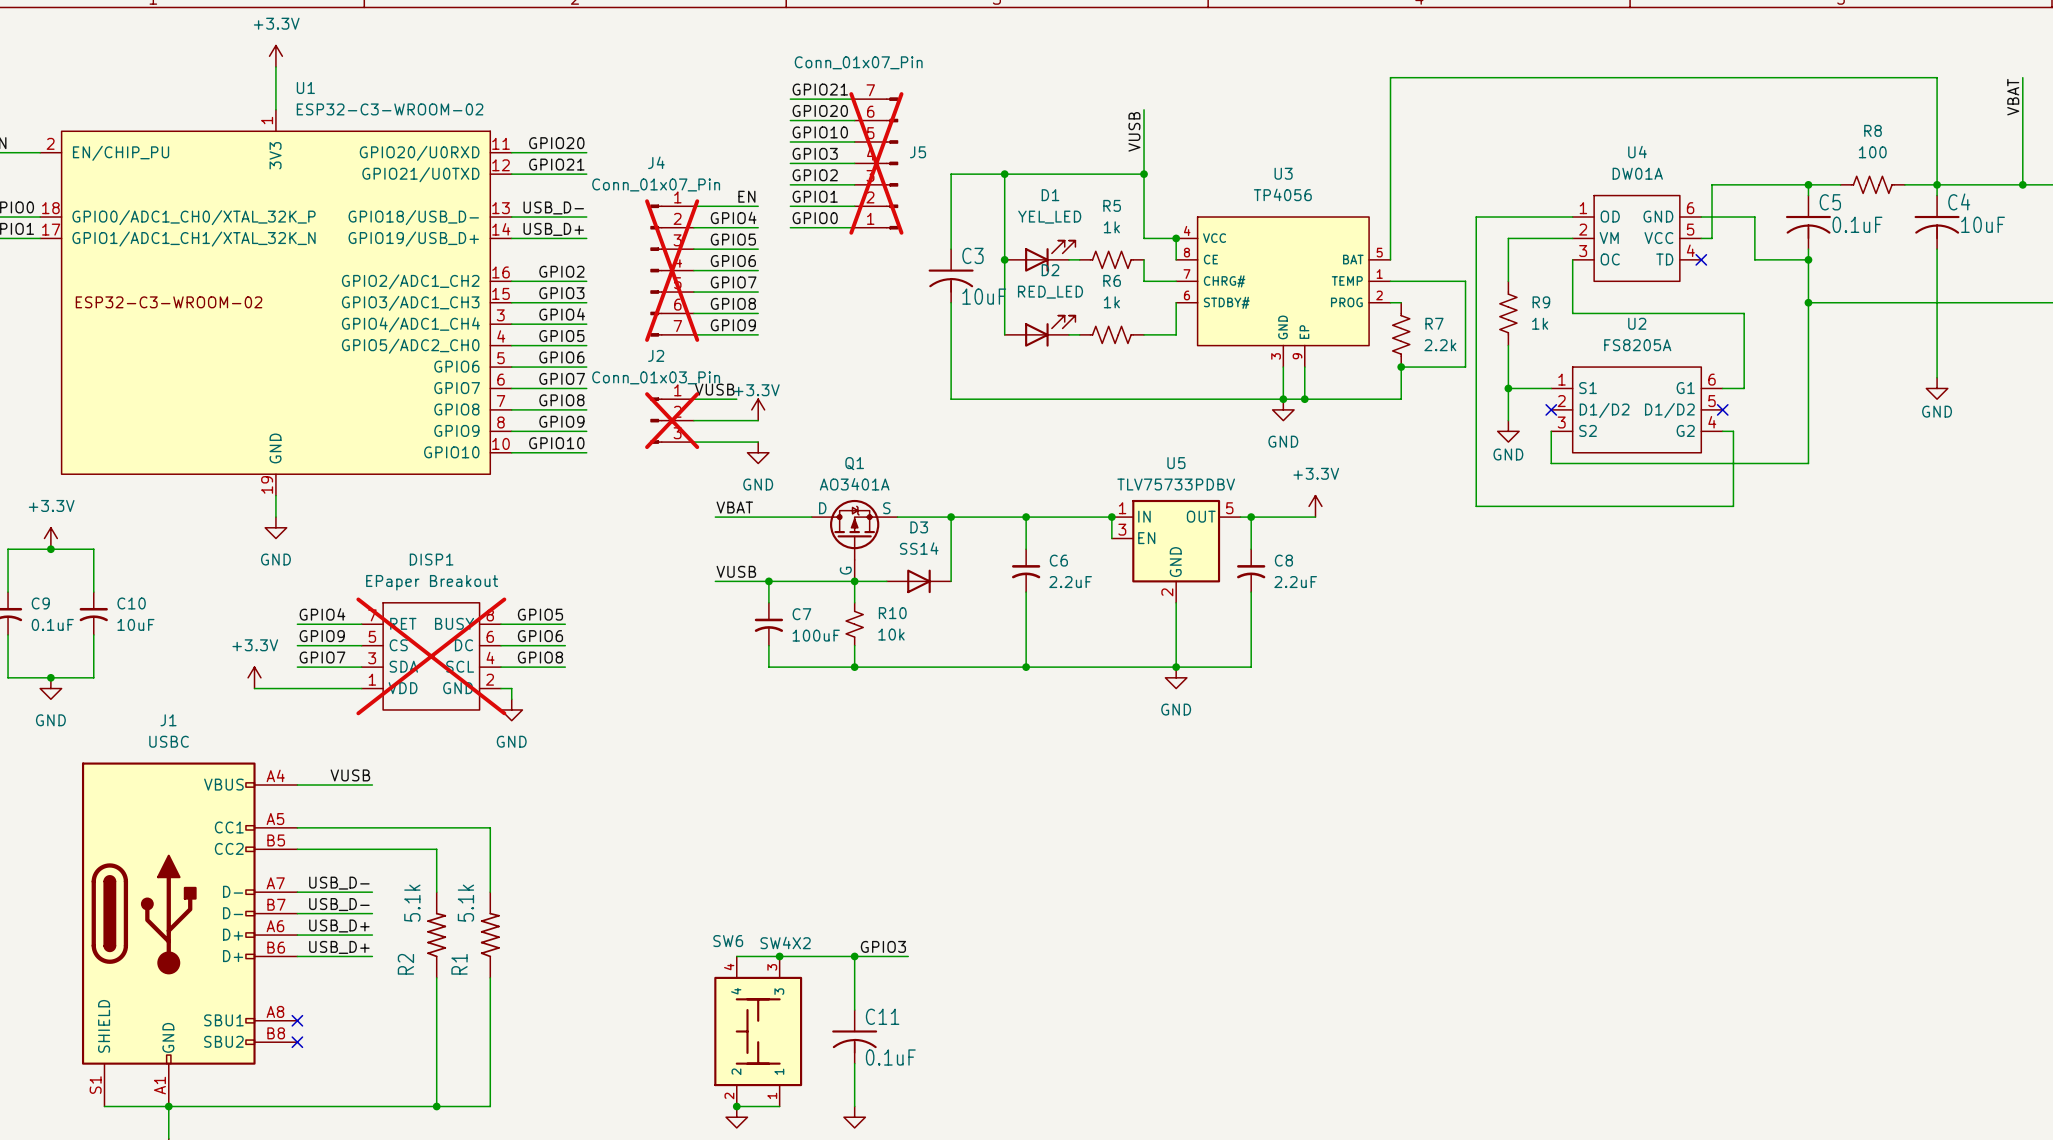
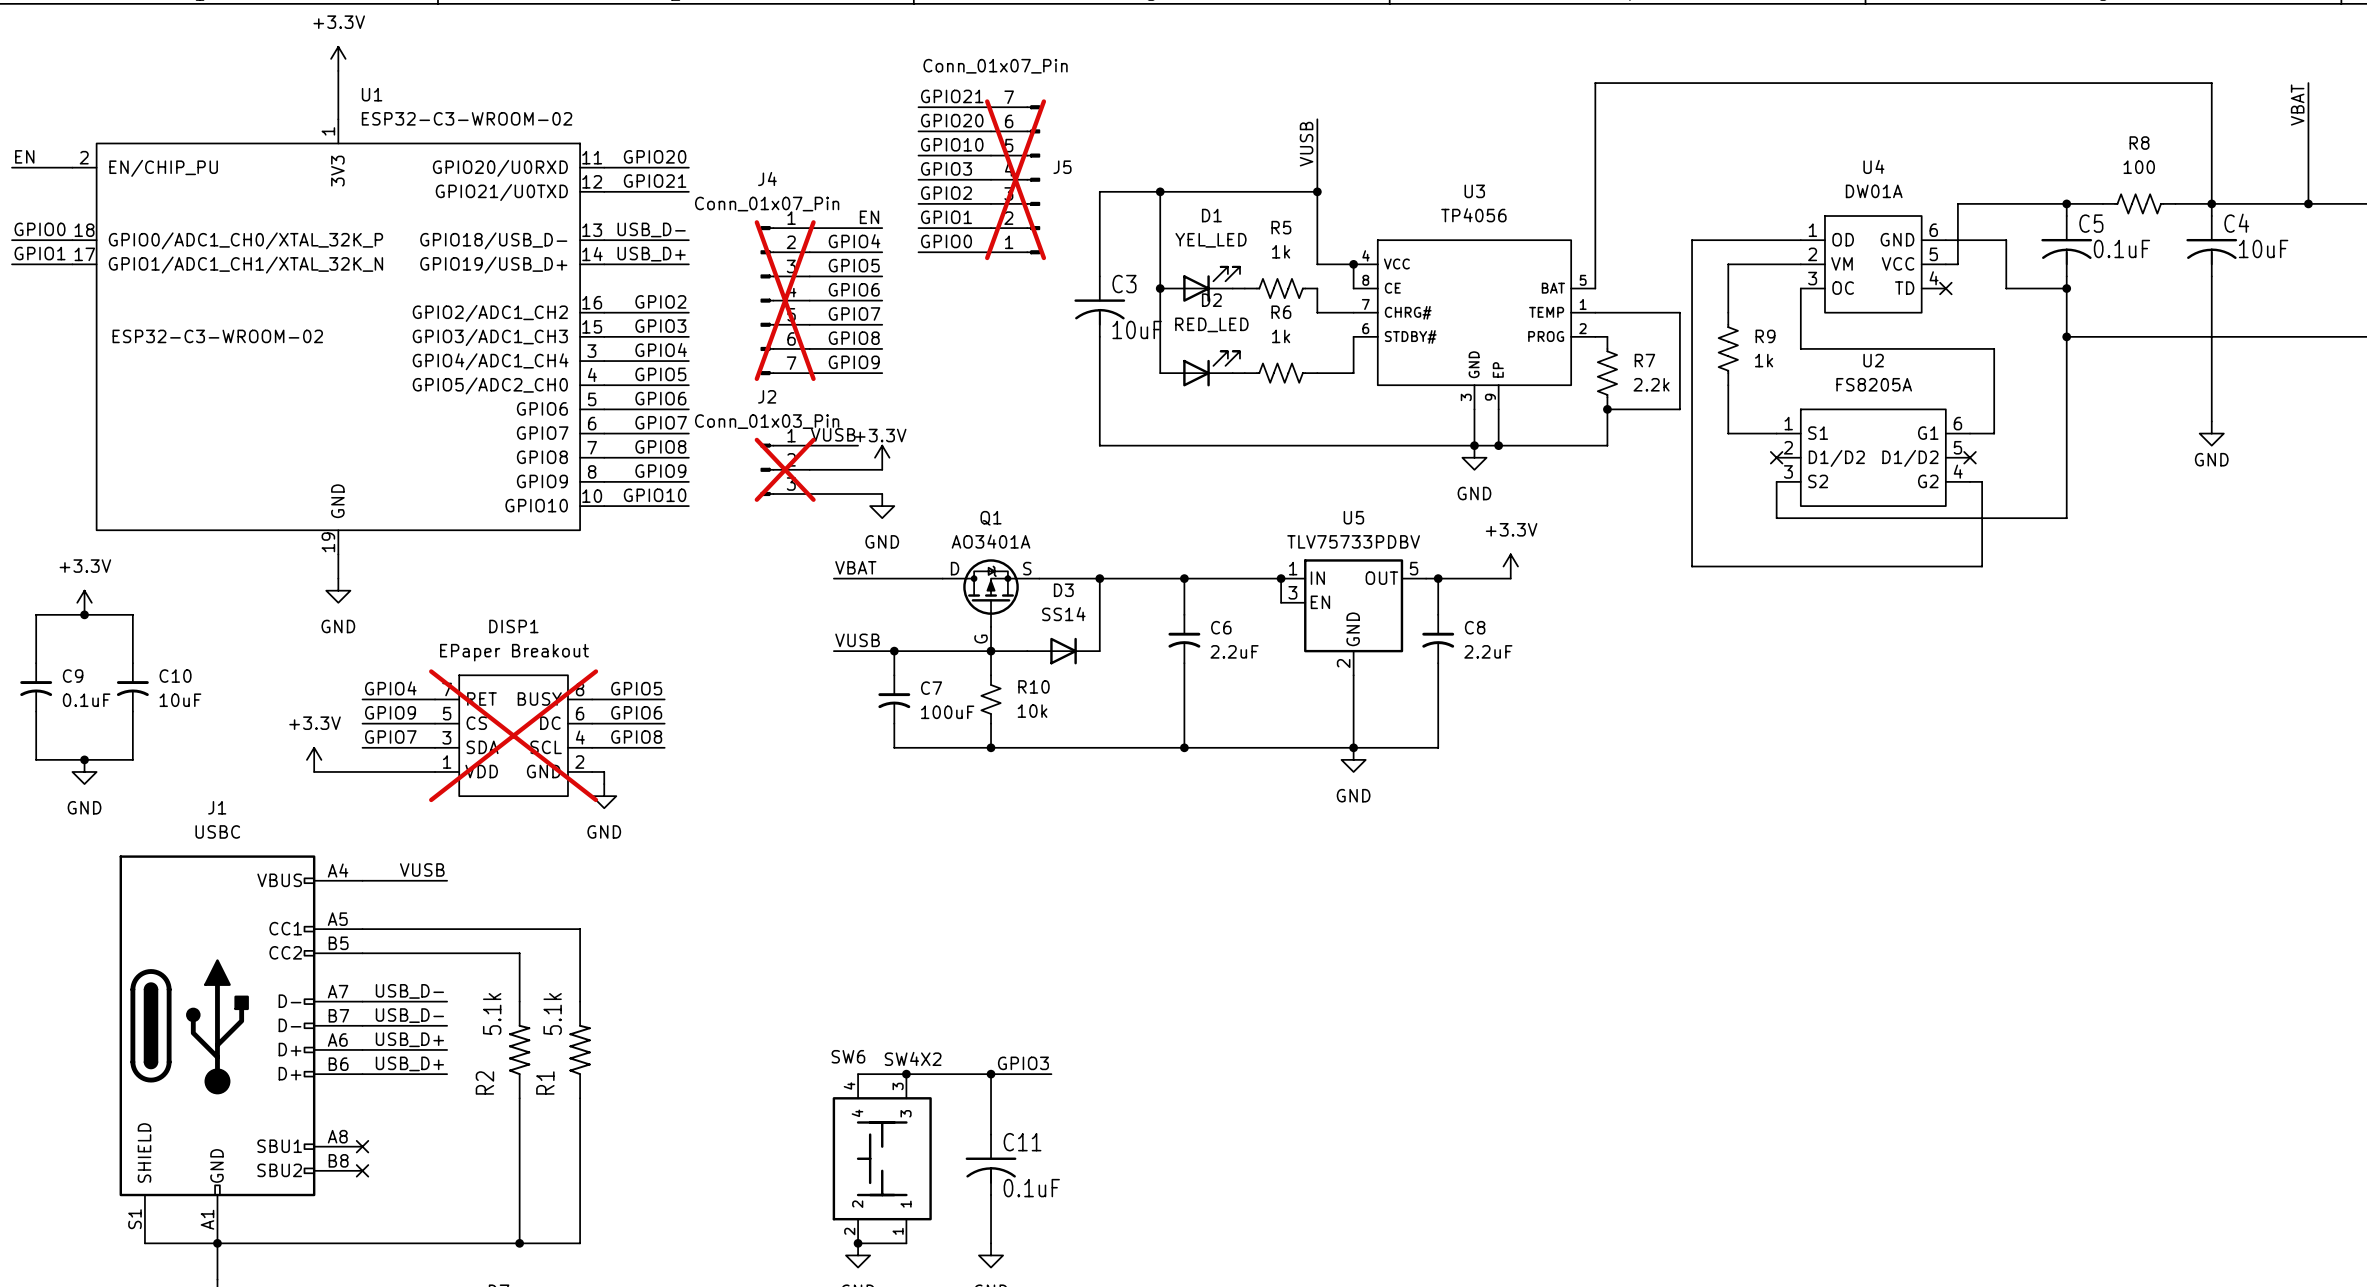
wire: (1508, 388) (1508, 420) -> none
junction: (1508, 388) -> none
power symbol: GND (1508, 431) -> none

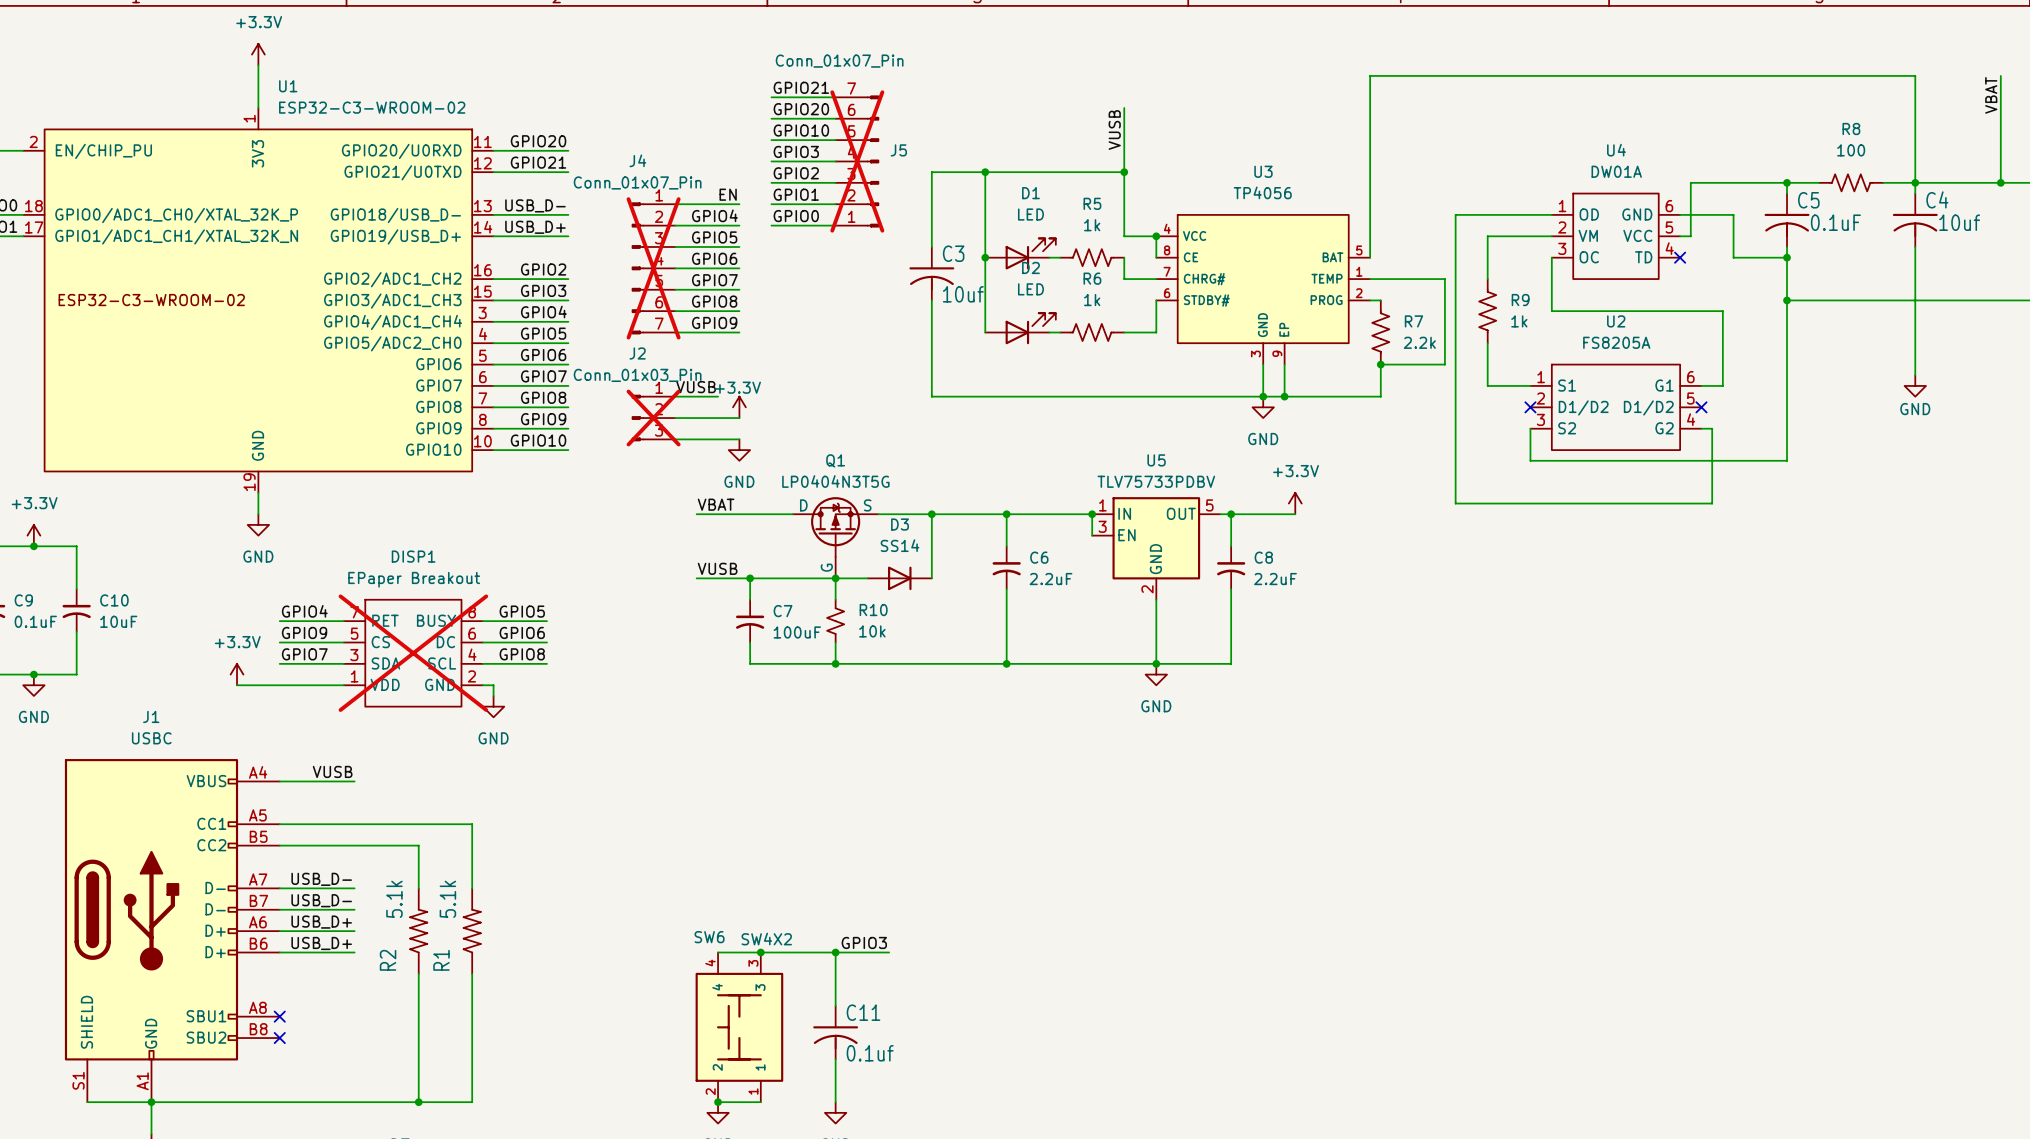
D1 value: YEL_LED (1211, 240) -> LED (1030, 214)
C4 value: 10uF (2263, 248) -> 10uf (1959, 222)
D2 value: RED_LED (1211, 324) -> LED (1030, 289)
C3 value: 10uF (1137, 329) -> 10uf (963, 294)
Q1 value: AO3401A (991, 541) -> LP0404N3T5G (835, 481)
C11 value: 0.1uF (1031, 1188) -> 0.1uf (870, 1053)

